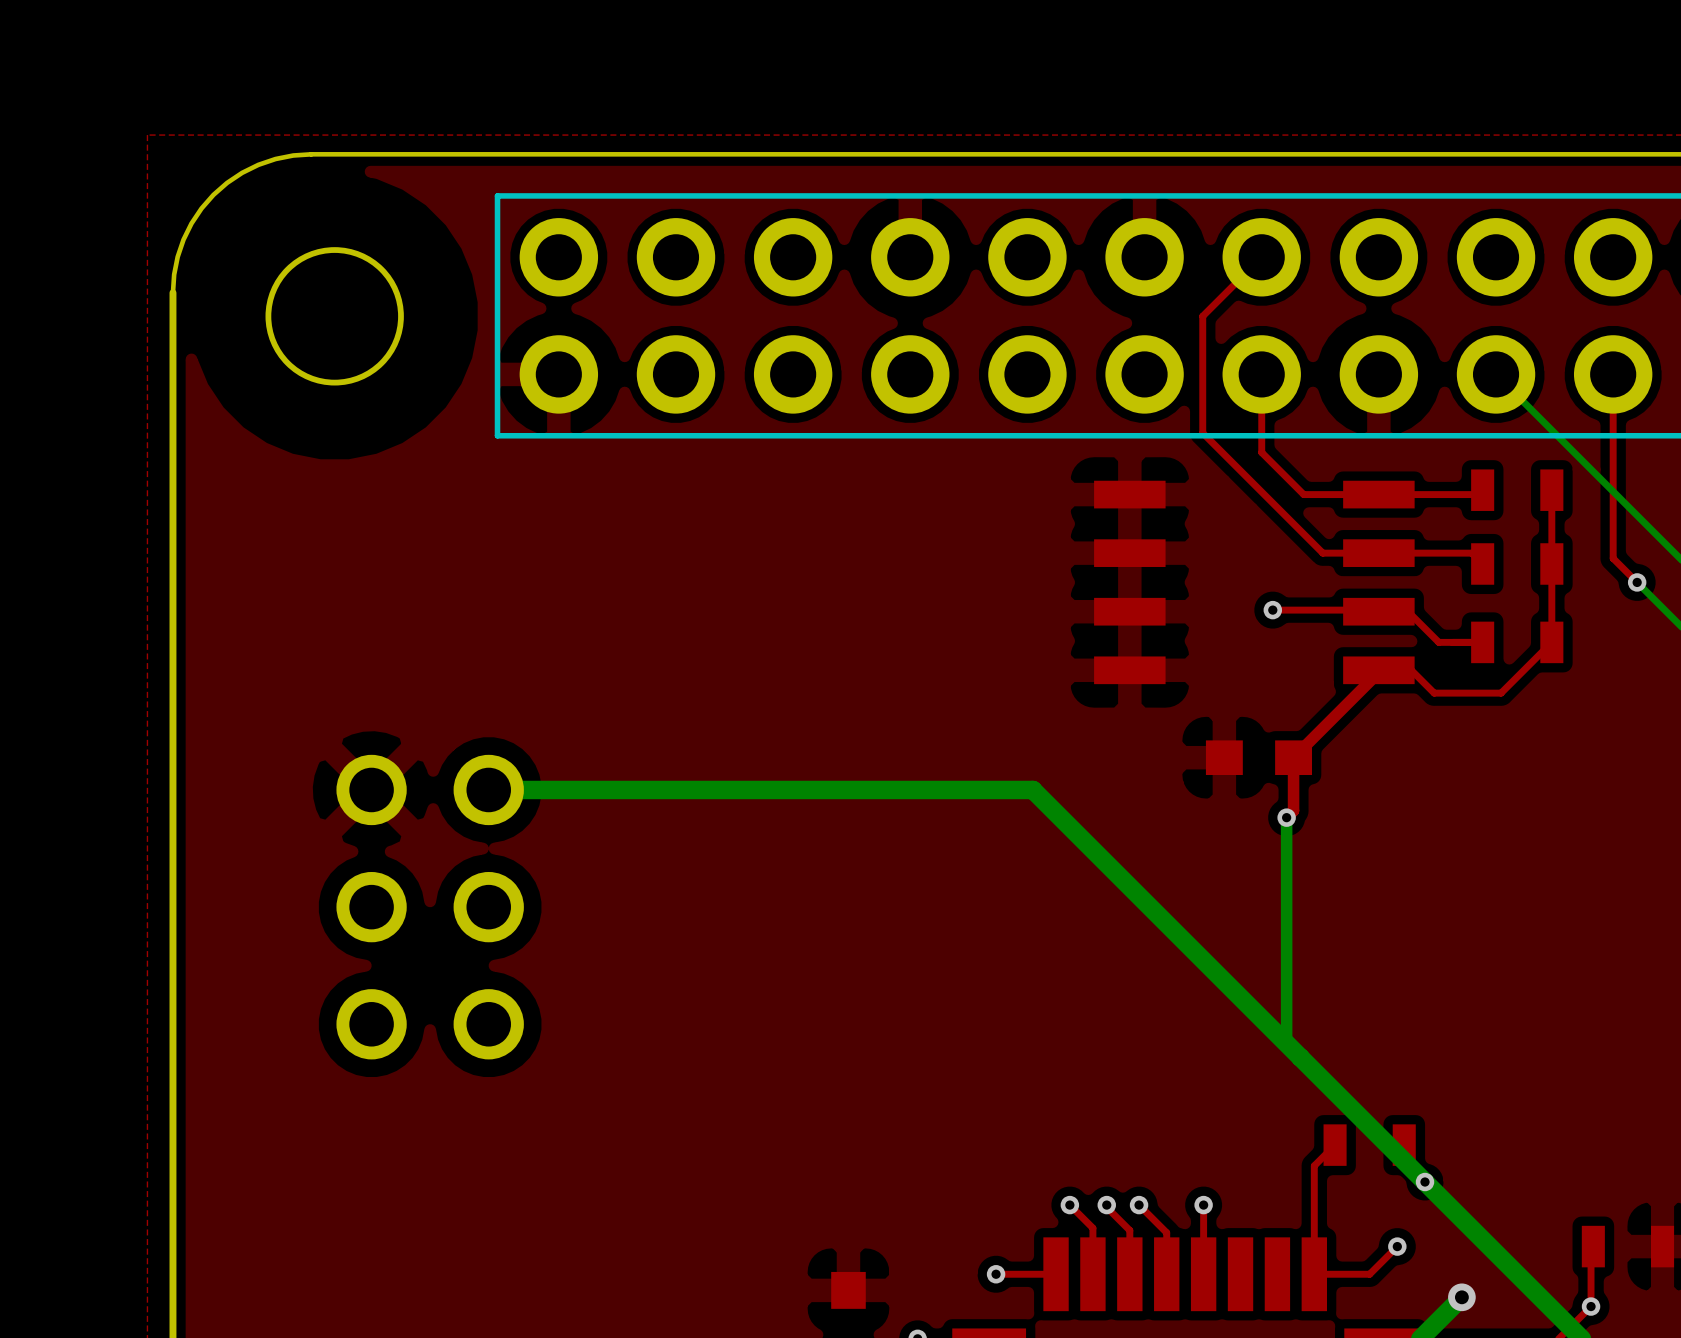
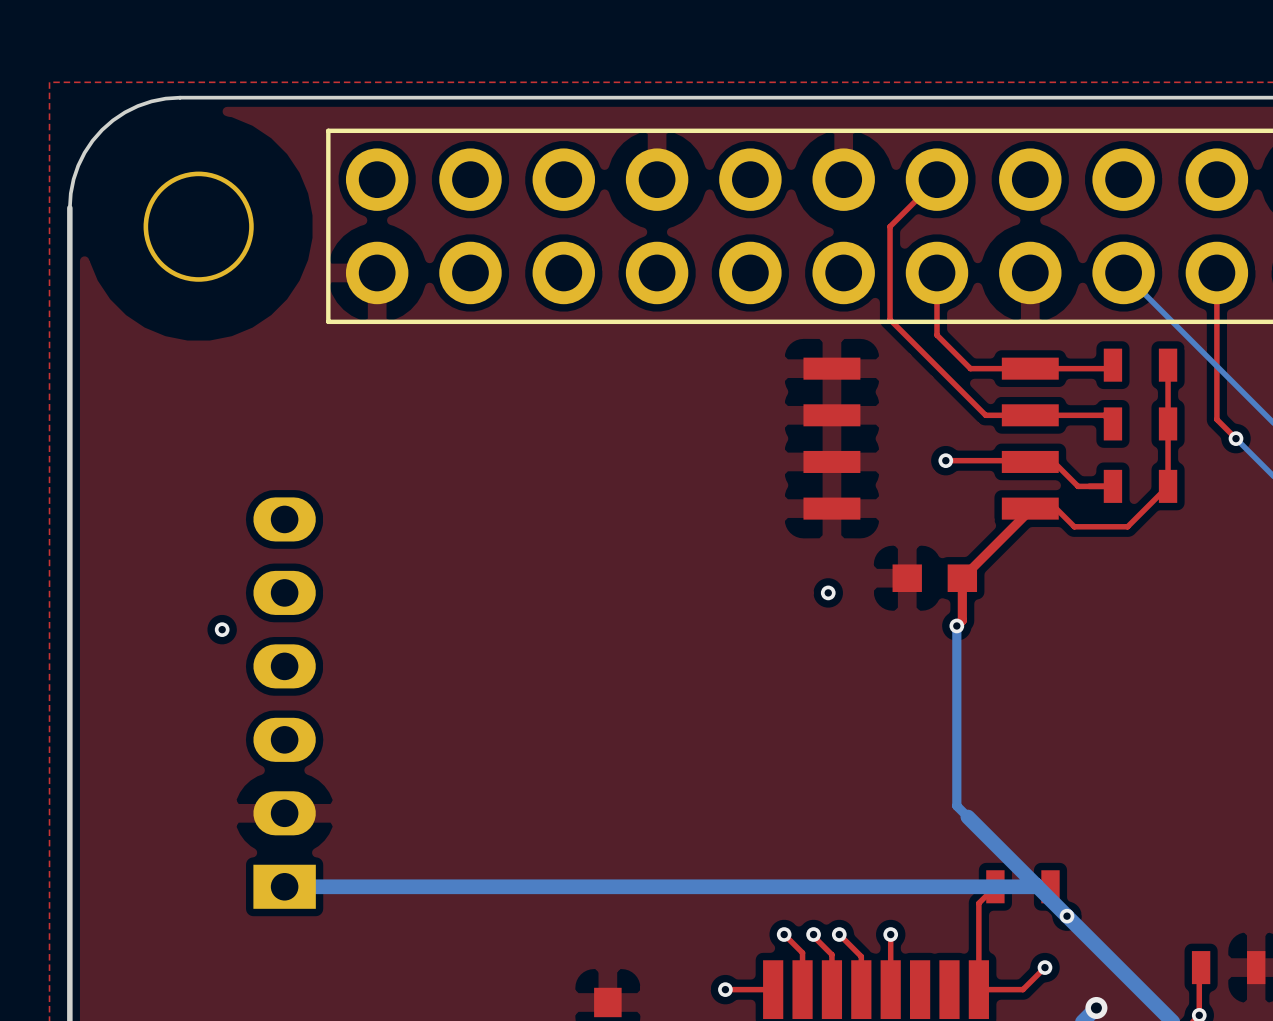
part footprint: [336, 754, 524, 1060] -> [253, 497, 316, 909]
via: none -> (828, 592)
bottom track: (488, 789) (1032, 789) (1300, 1057) -> none
via: none -> (222, 629)
bottom track: none -> (1035, 884) (1033, 886) (284, 886)

